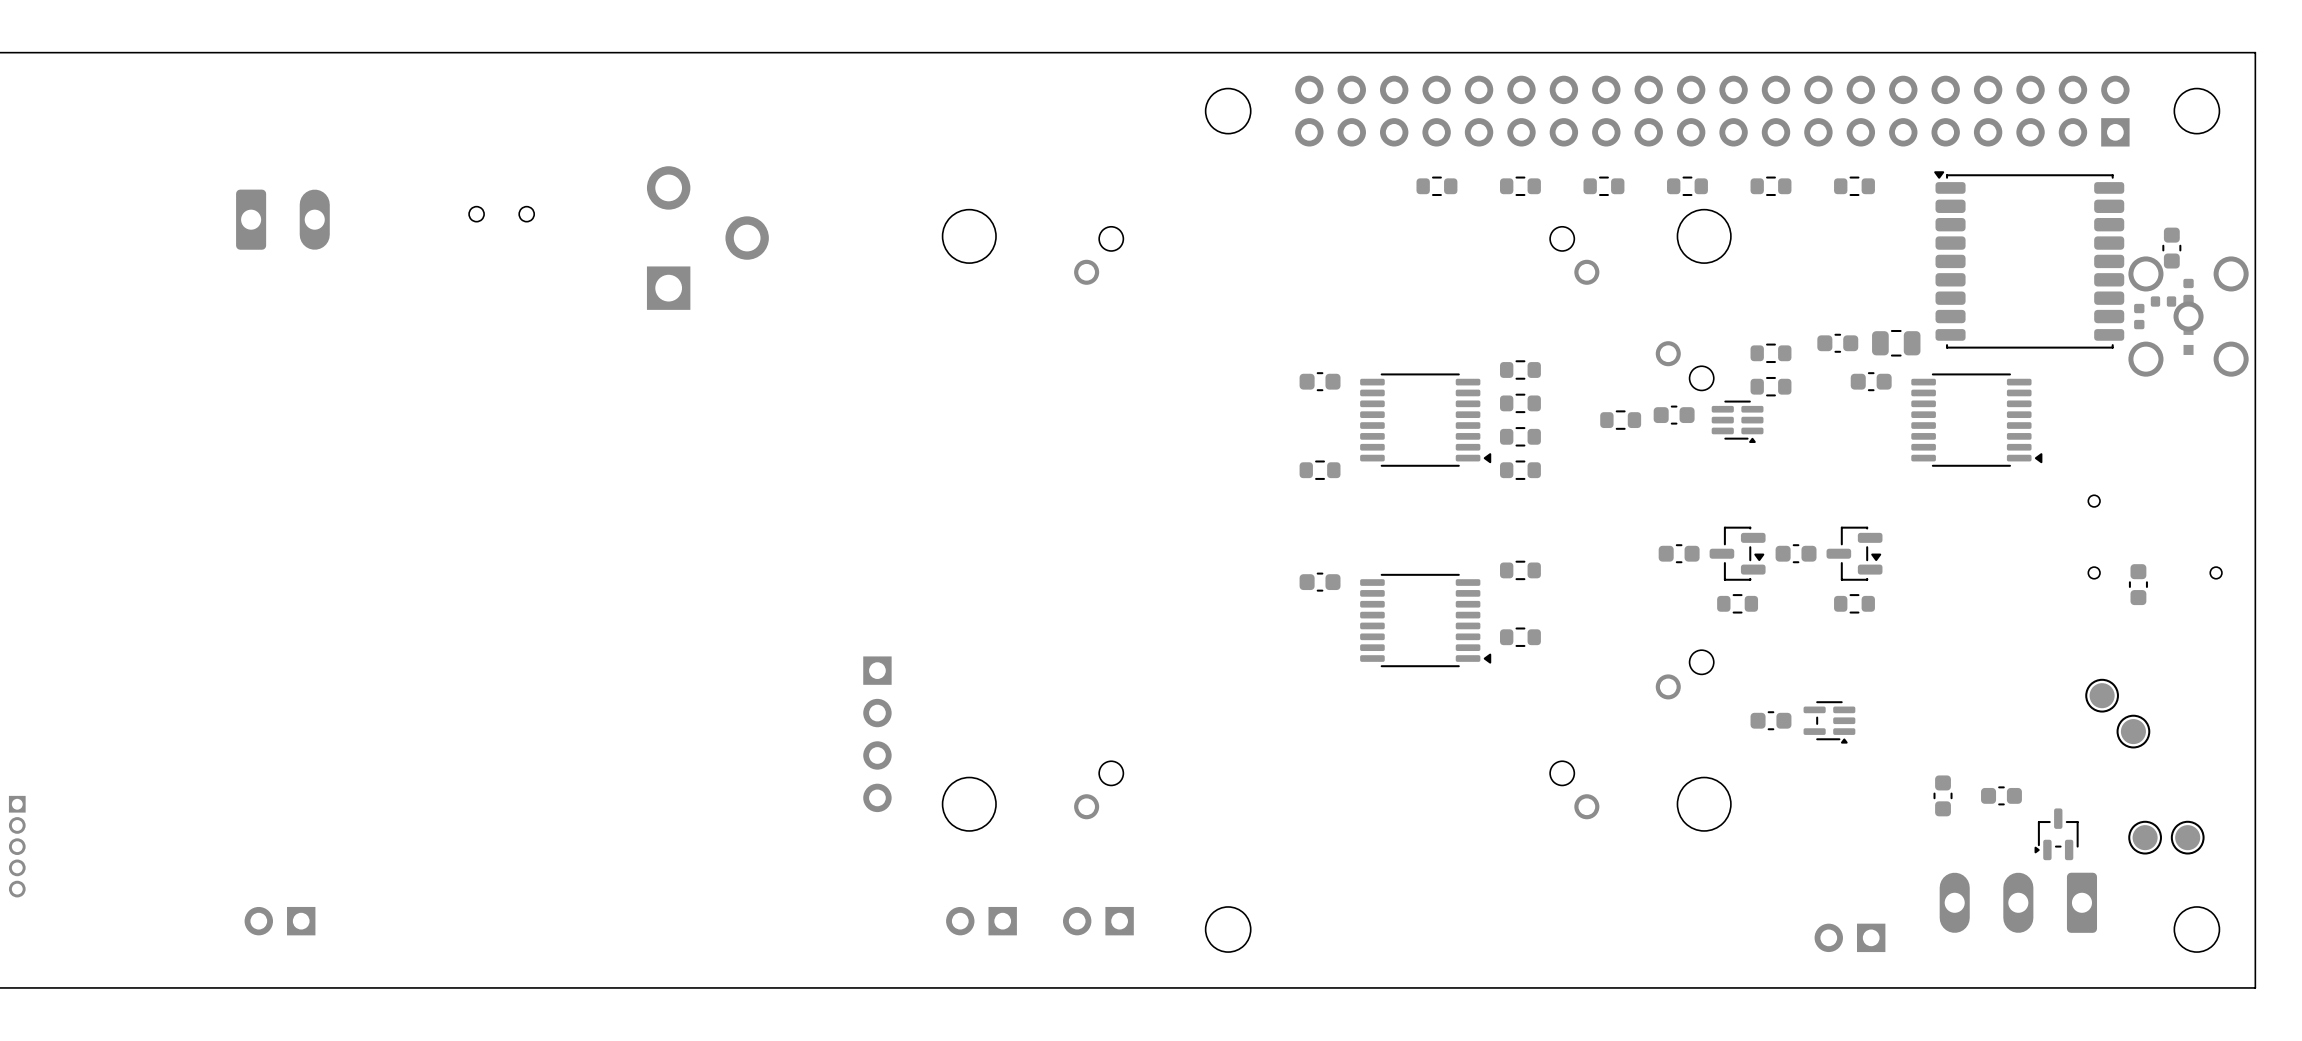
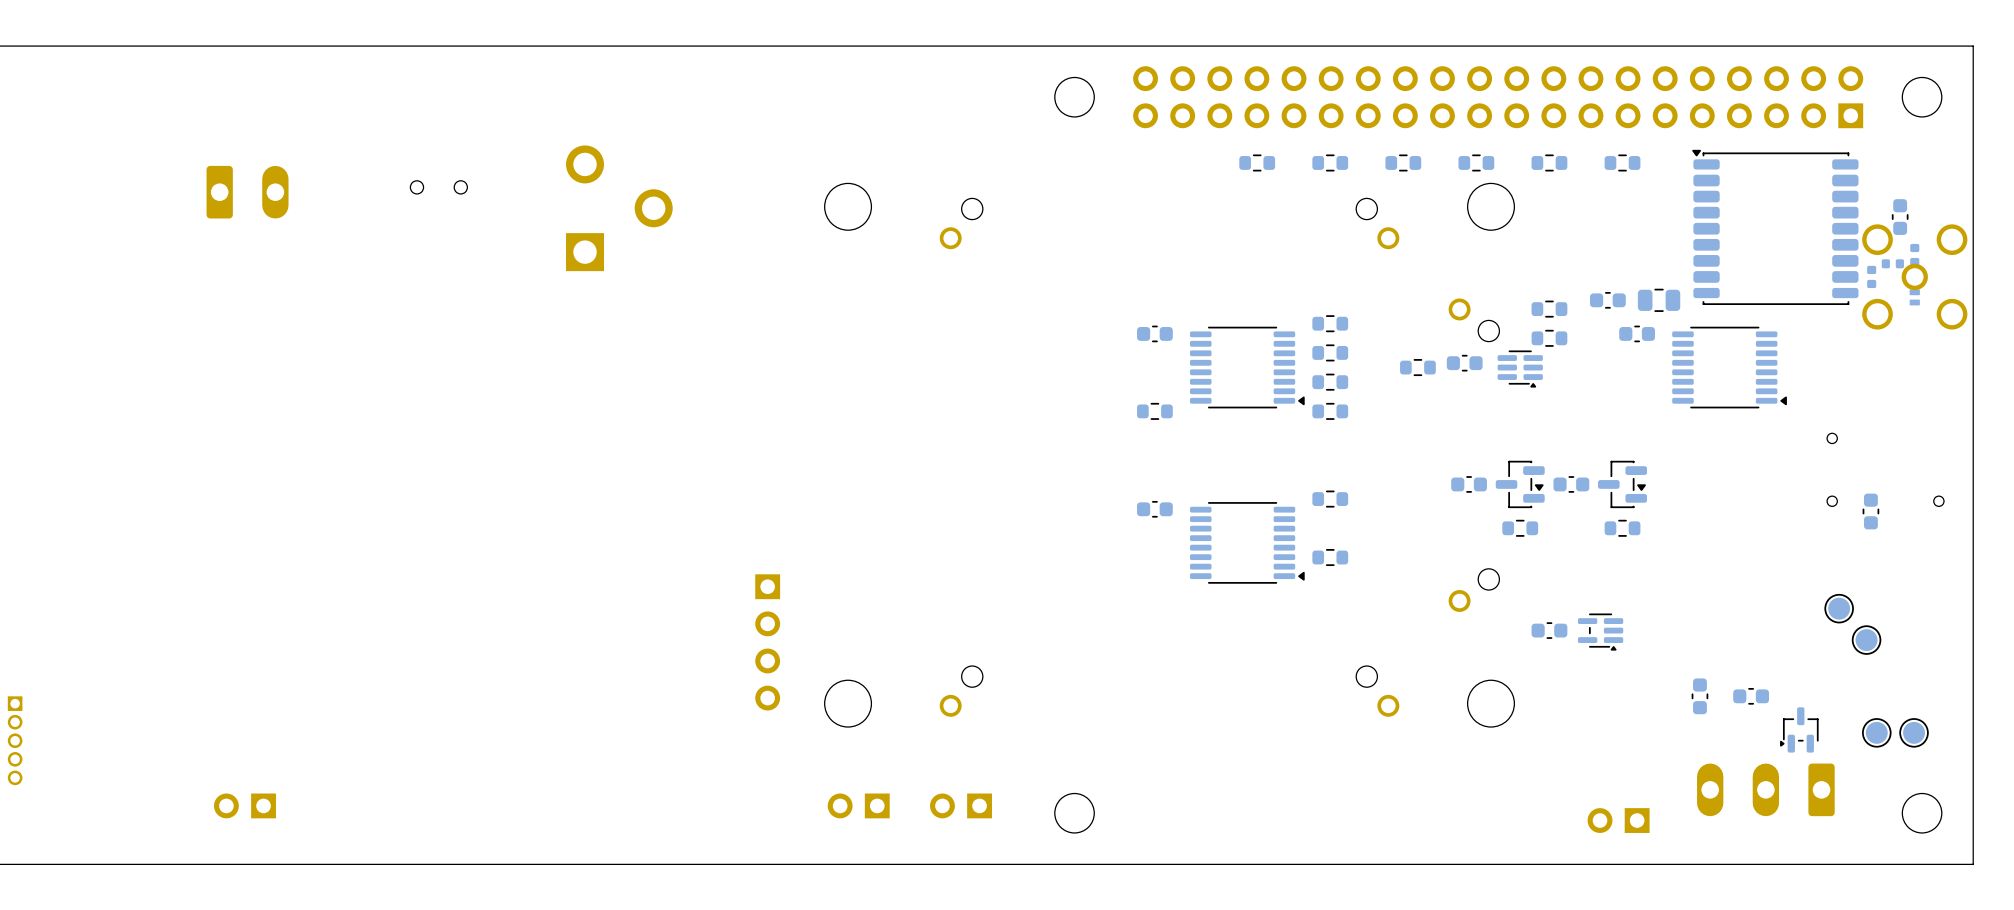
part footprint: [2183, 324, 2194, 355] -> [1909, 289, 1920, 306]

